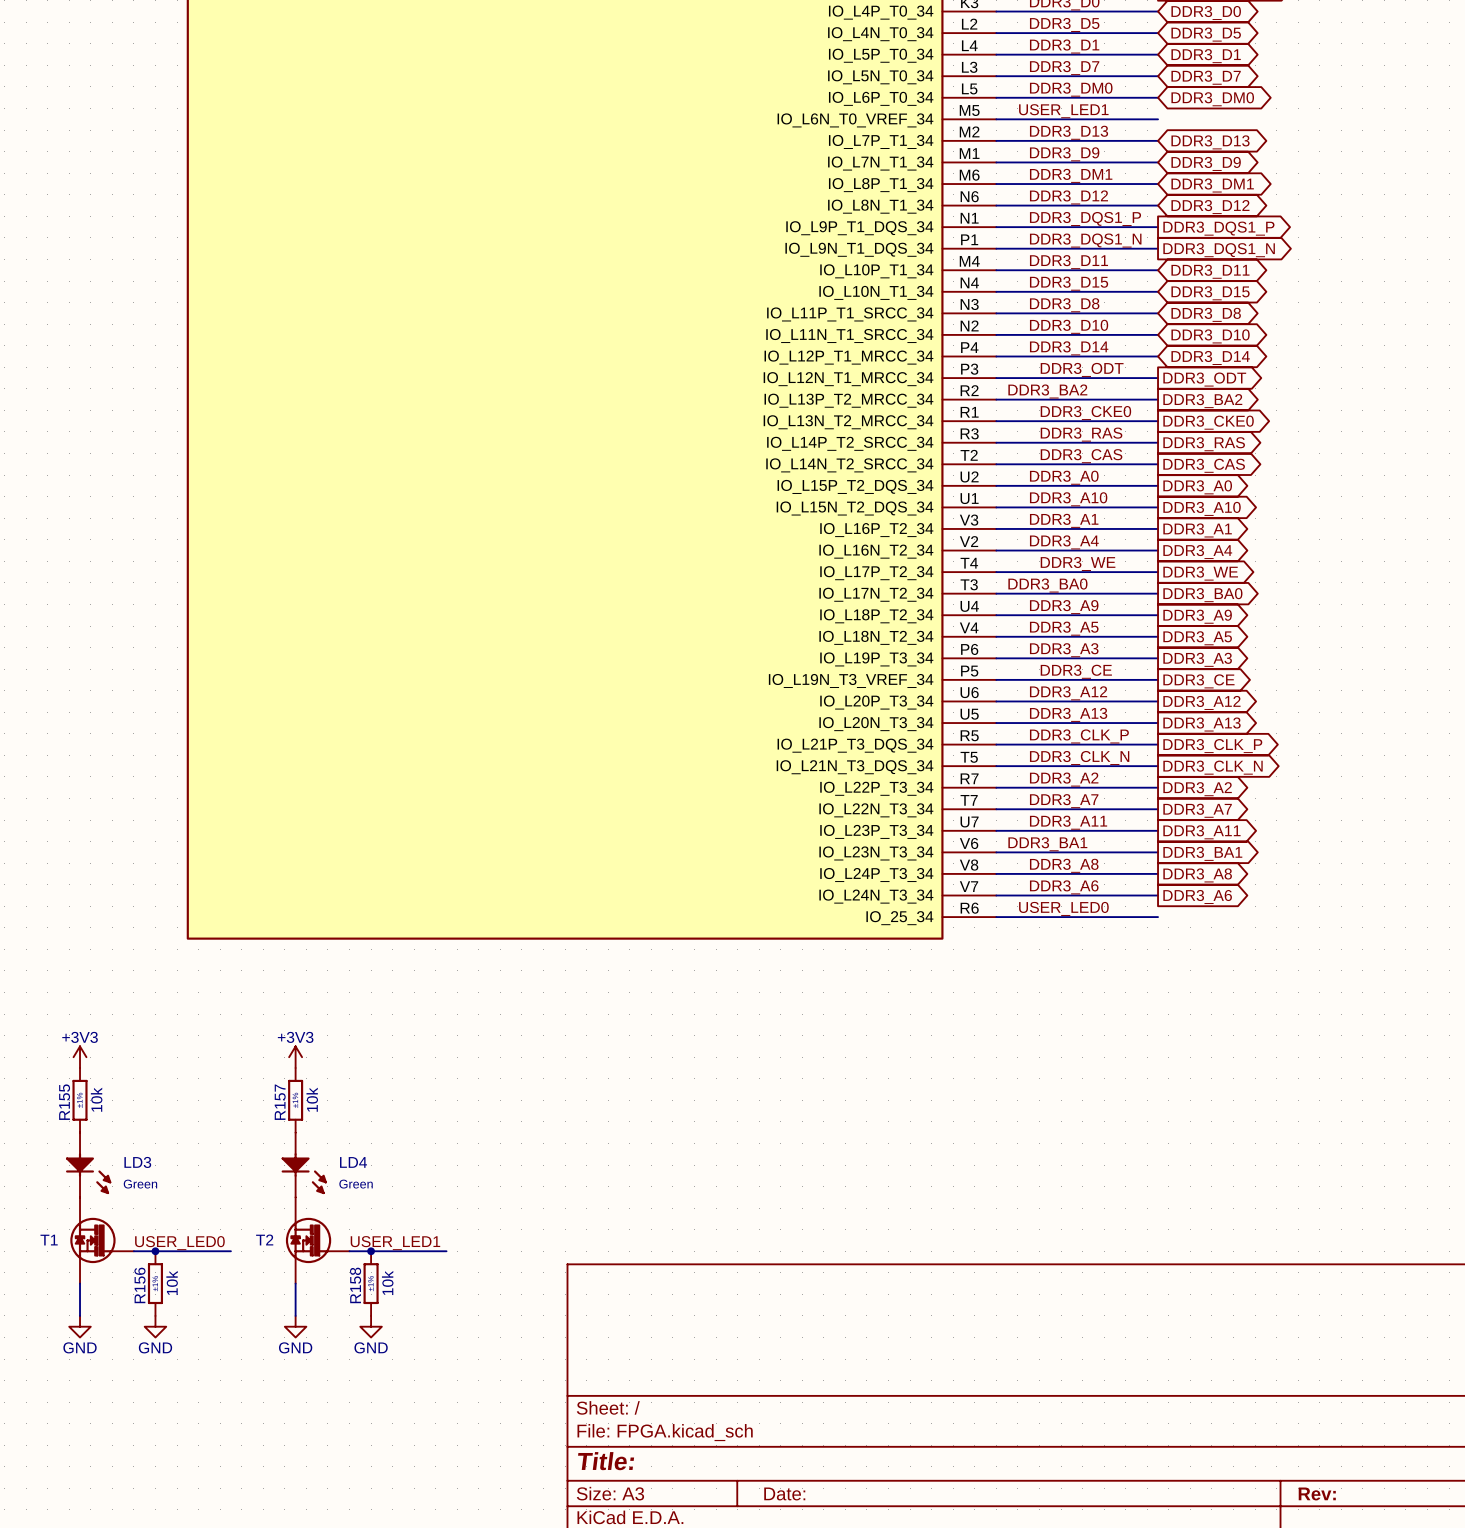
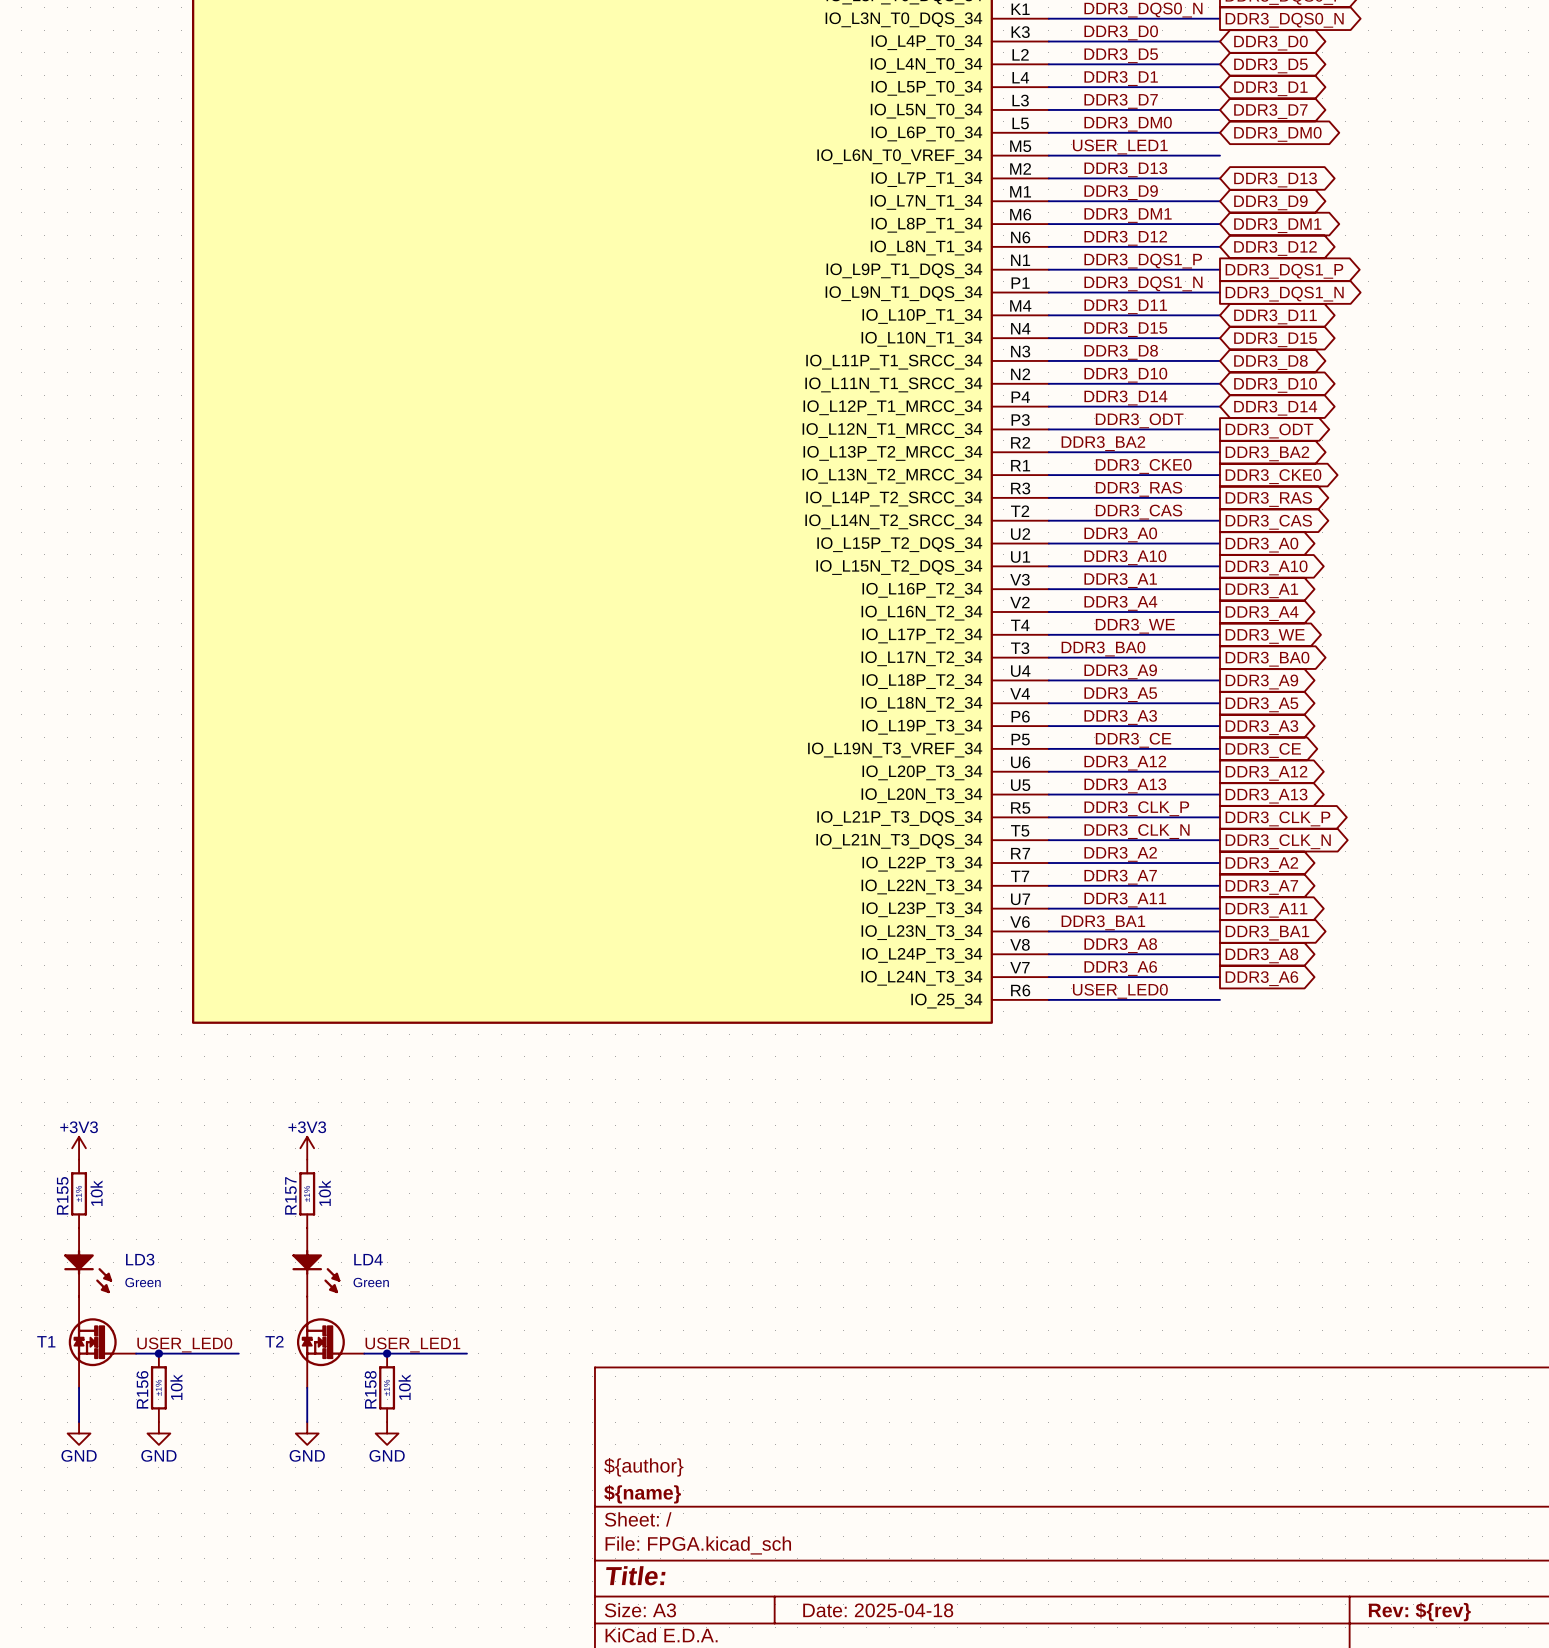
title block: none -> ${author} (643, 1467)
title block: none -> ${name} (642, 1494)
title block: Date: (784, 1493) -> Date: 2025-04-18 (878, 1610)
title block: Rev: (1317, 1493) -> Rev: ${rev} (1419, 1611)

